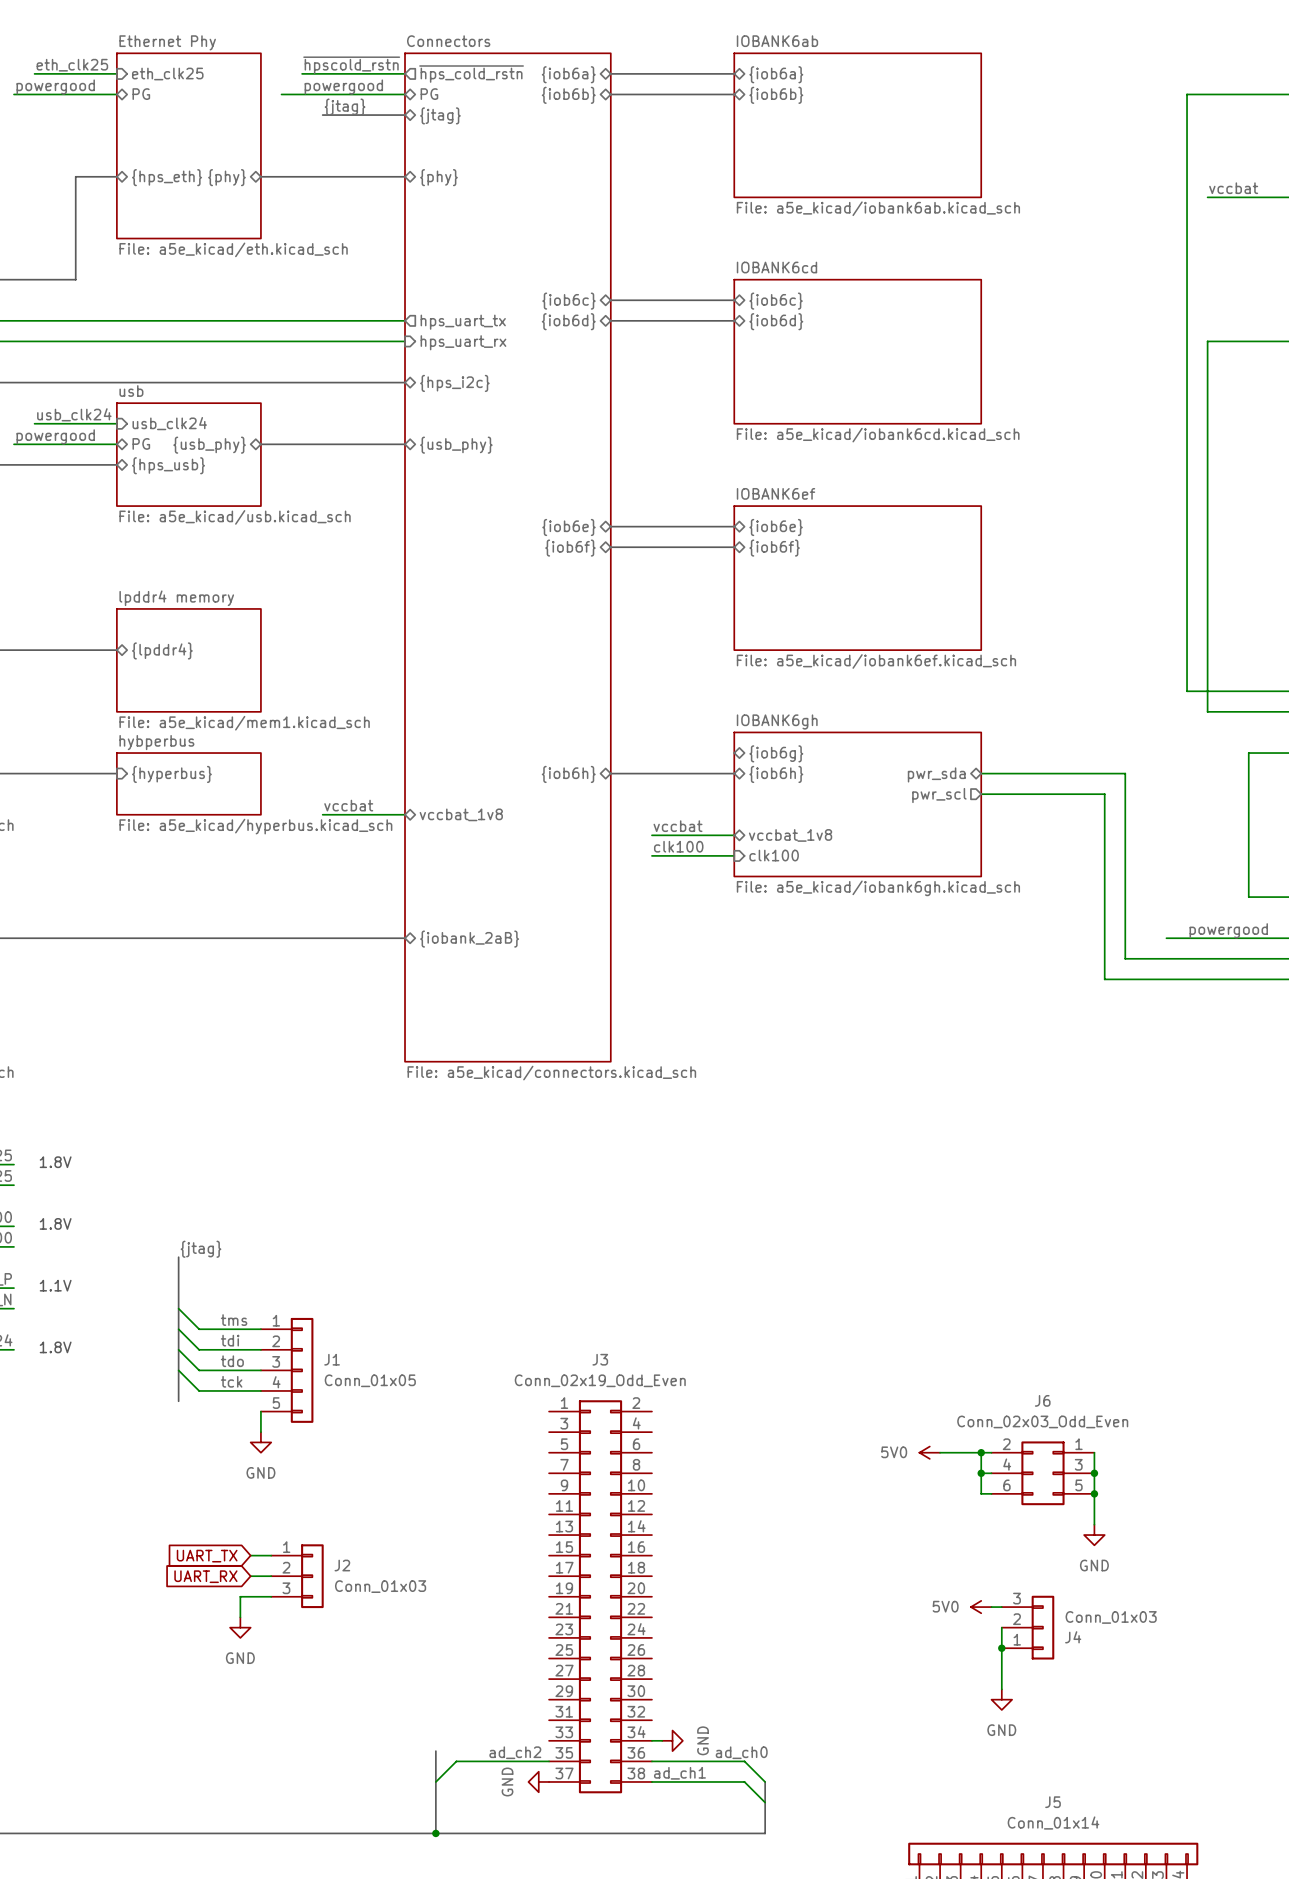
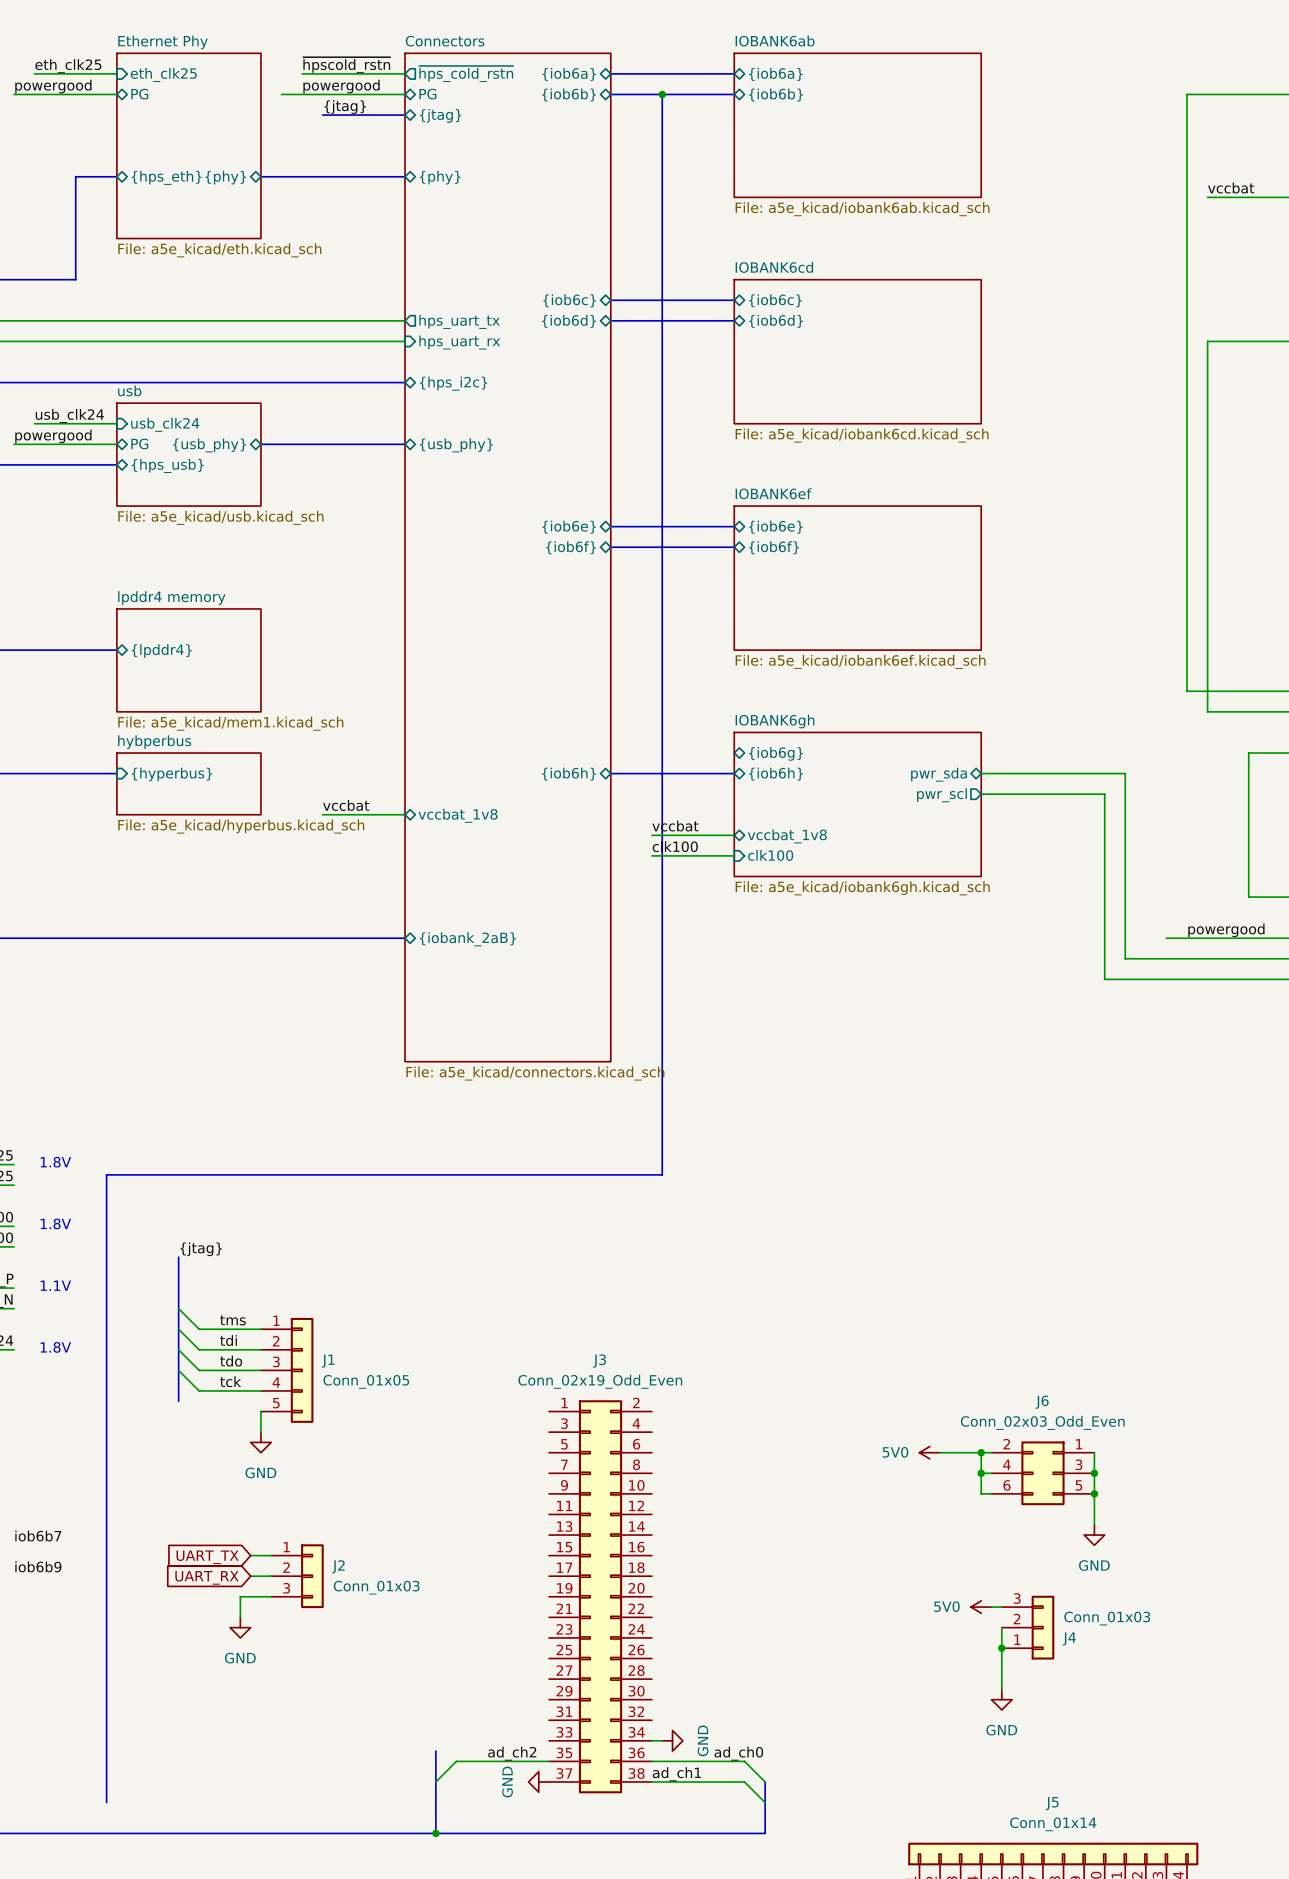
bus: none -> (662, 94) (662, 1174) (106, 1174) (106, 1802)
junction: none -> (662, 94)
label: none -> iob6b7 (38, 1536)
label: none -> iob6b9 (38, 1566)

